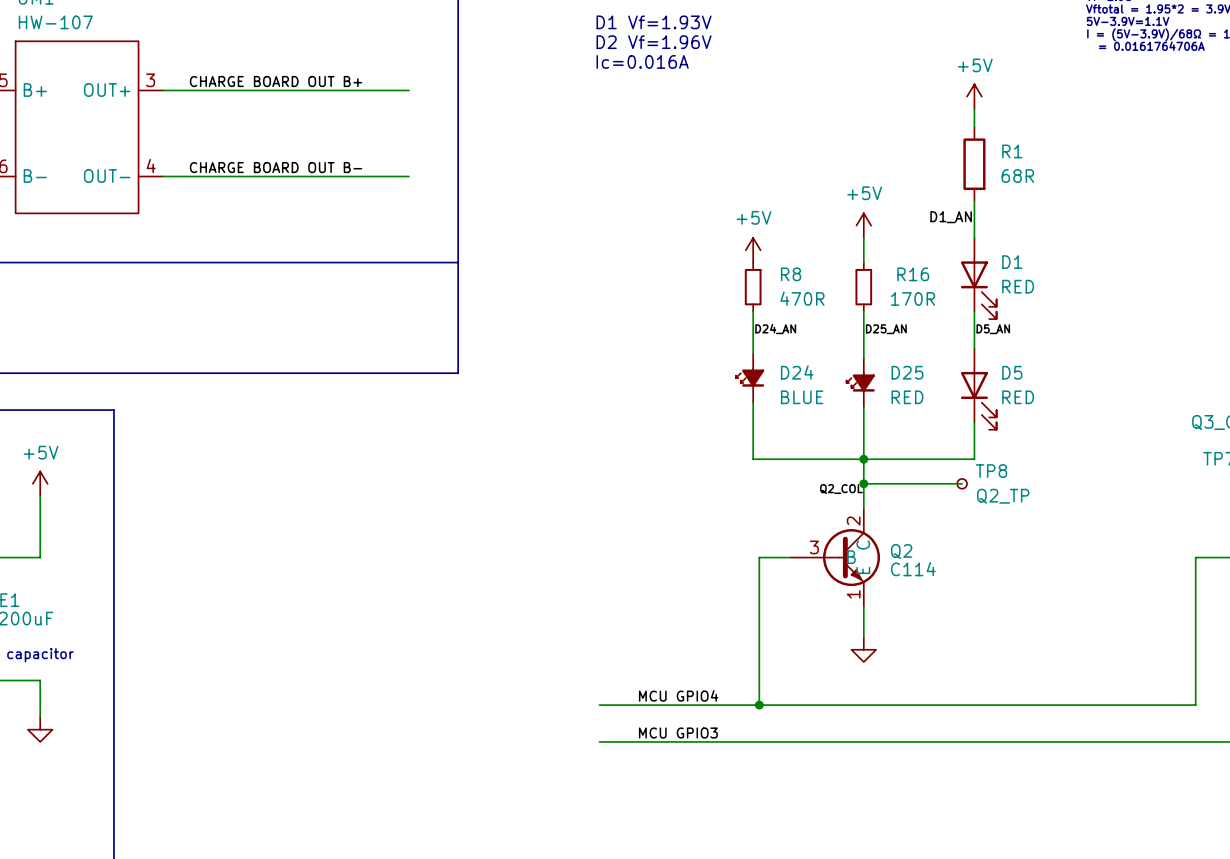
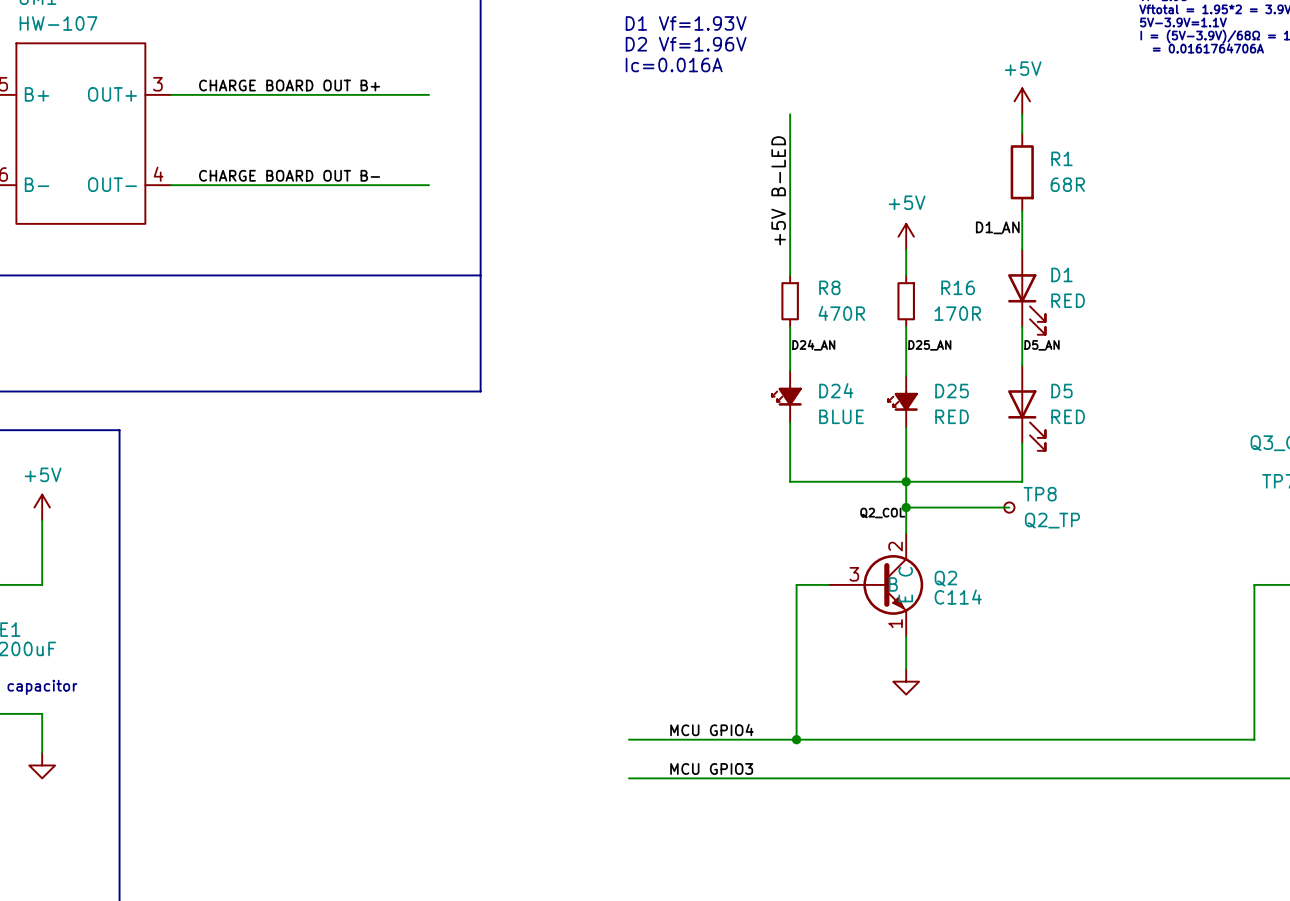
wire: none -> (790, 114) (790, 275)
label: none -> +5V B-LED (778, 190)
power symbol: +5V (753, 250) -> none

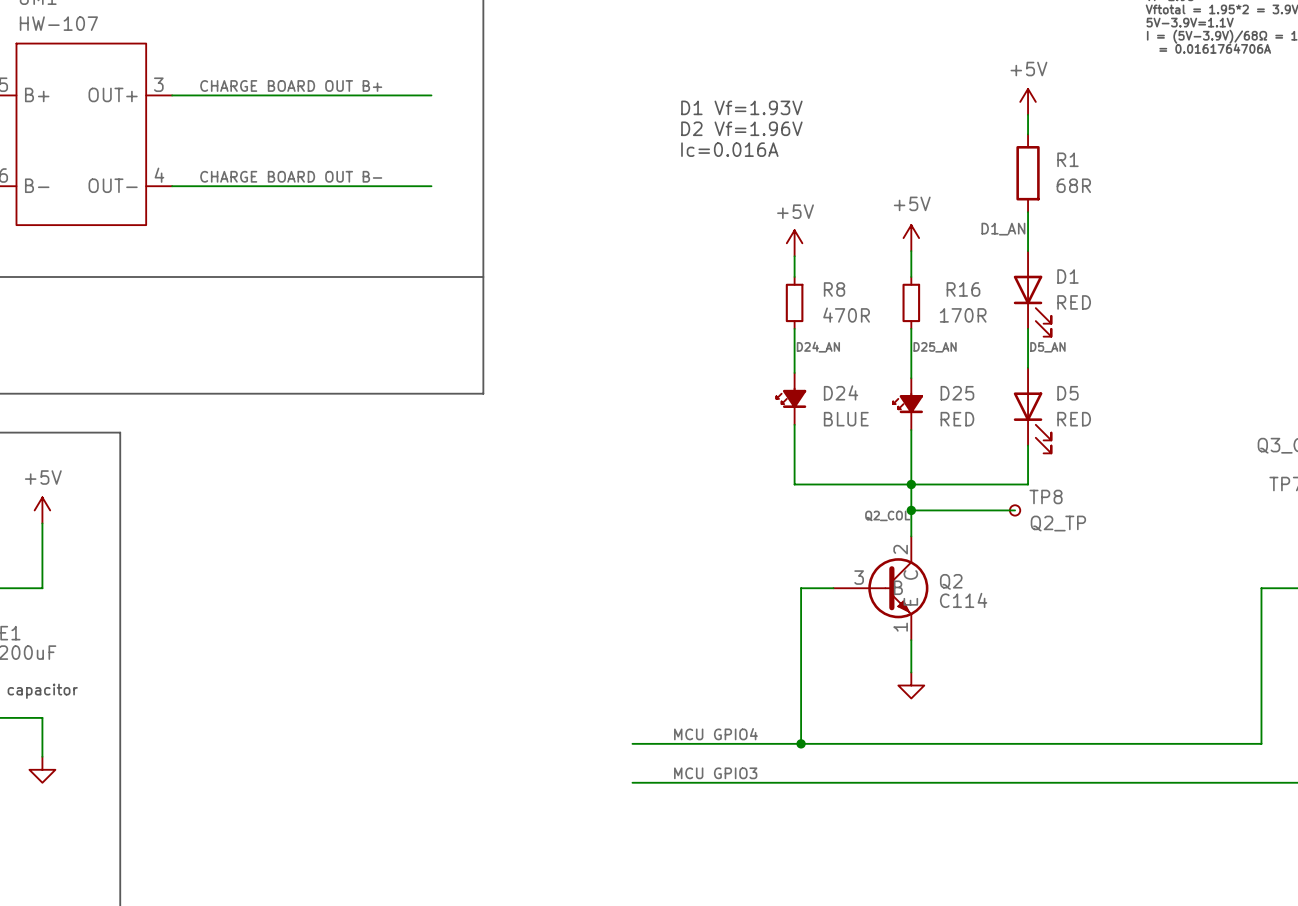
text position: D1 Vf=1.93V (686, 23) -> D1 Vf=1.93V (741, 107)
text position: D2 Vf=1.96V (686, 44) -> D2 Vf=1.96V (741, 128)
text position: Ic=0.016A (674, 64) -> Ic=0.016A (729, 149)
wire: (790, 114) (790, 254) -> none
label: +5V B-LED (778, 190) -> none
power symbol: none -> +5V (794, 243)

